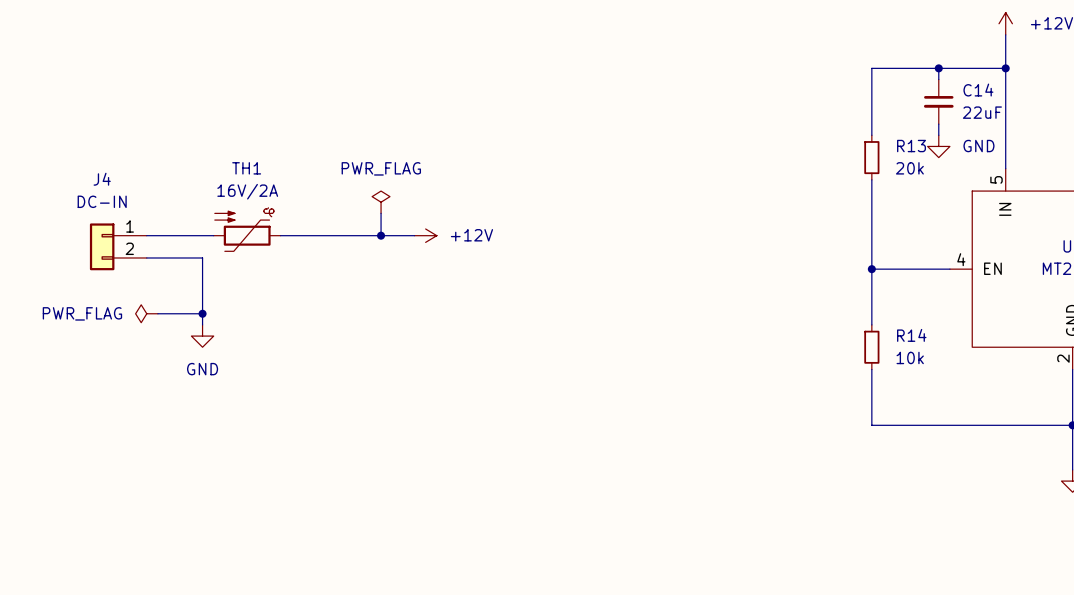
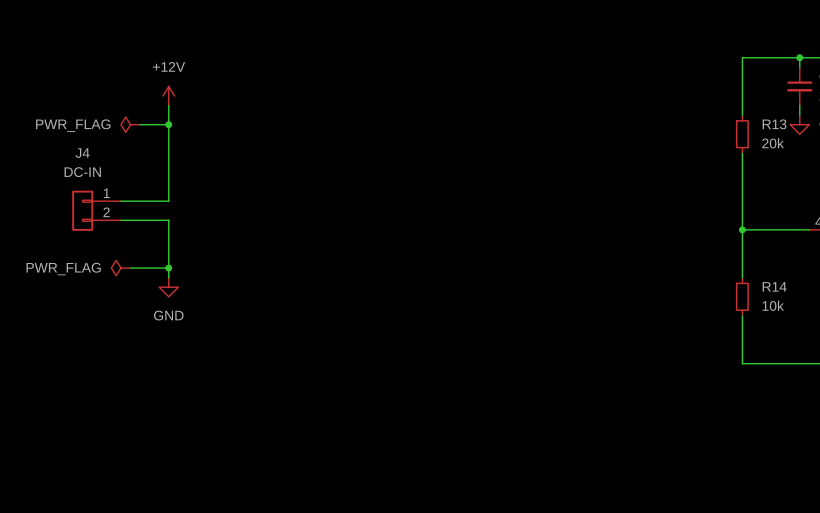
power symbol: none -> +12V (168, 96)
power symbol: none -> PWR_FLAG (130, 124)
wire: none -> (140, 124) (168, 124)
junction: none -> (168, 124)
power symbol: PWR_FLAG (381, 202) -> none
wire: (381, 213) (381, 235) -> none
TH1: 16V/2A (247, 229) -> none
wire: (202, 235) (213, 235) -> (168, 201) (168, 105)
wire: (280, 235) (414, 235) -> none
junction: (381, 235) -> none
power symbol: +12V (425, 235) -> none

